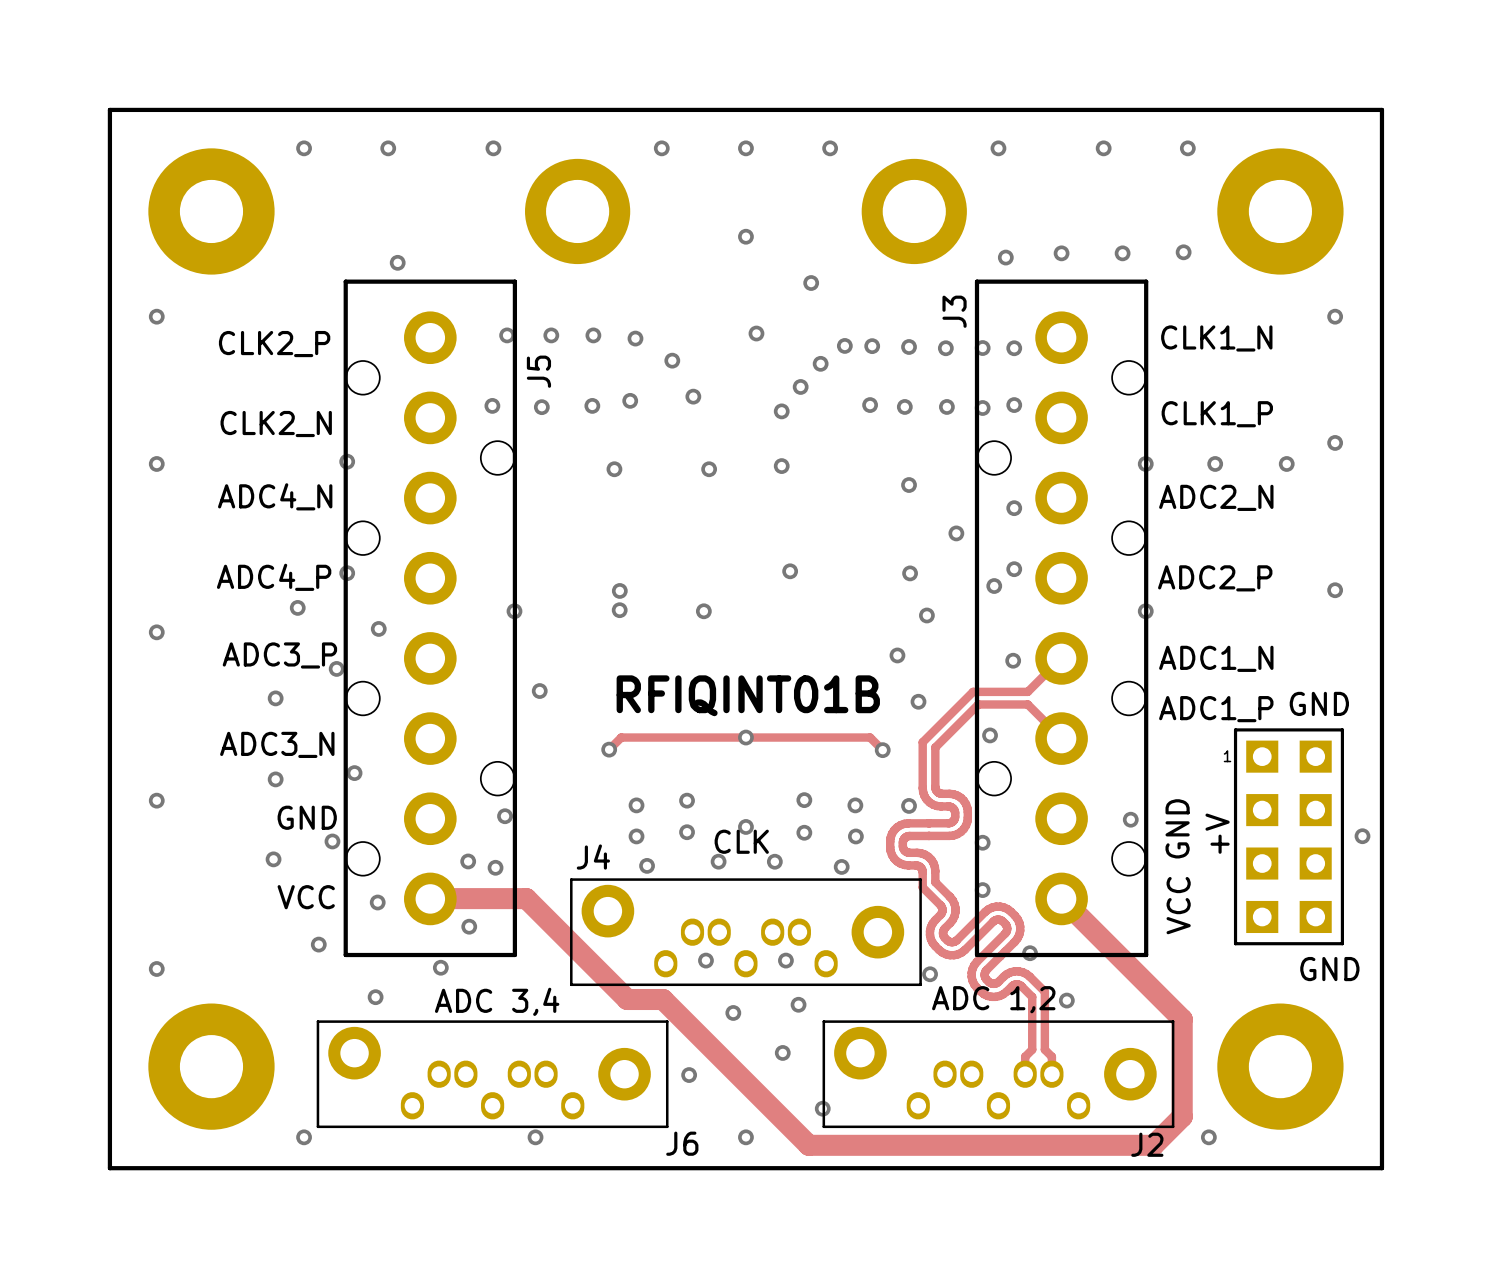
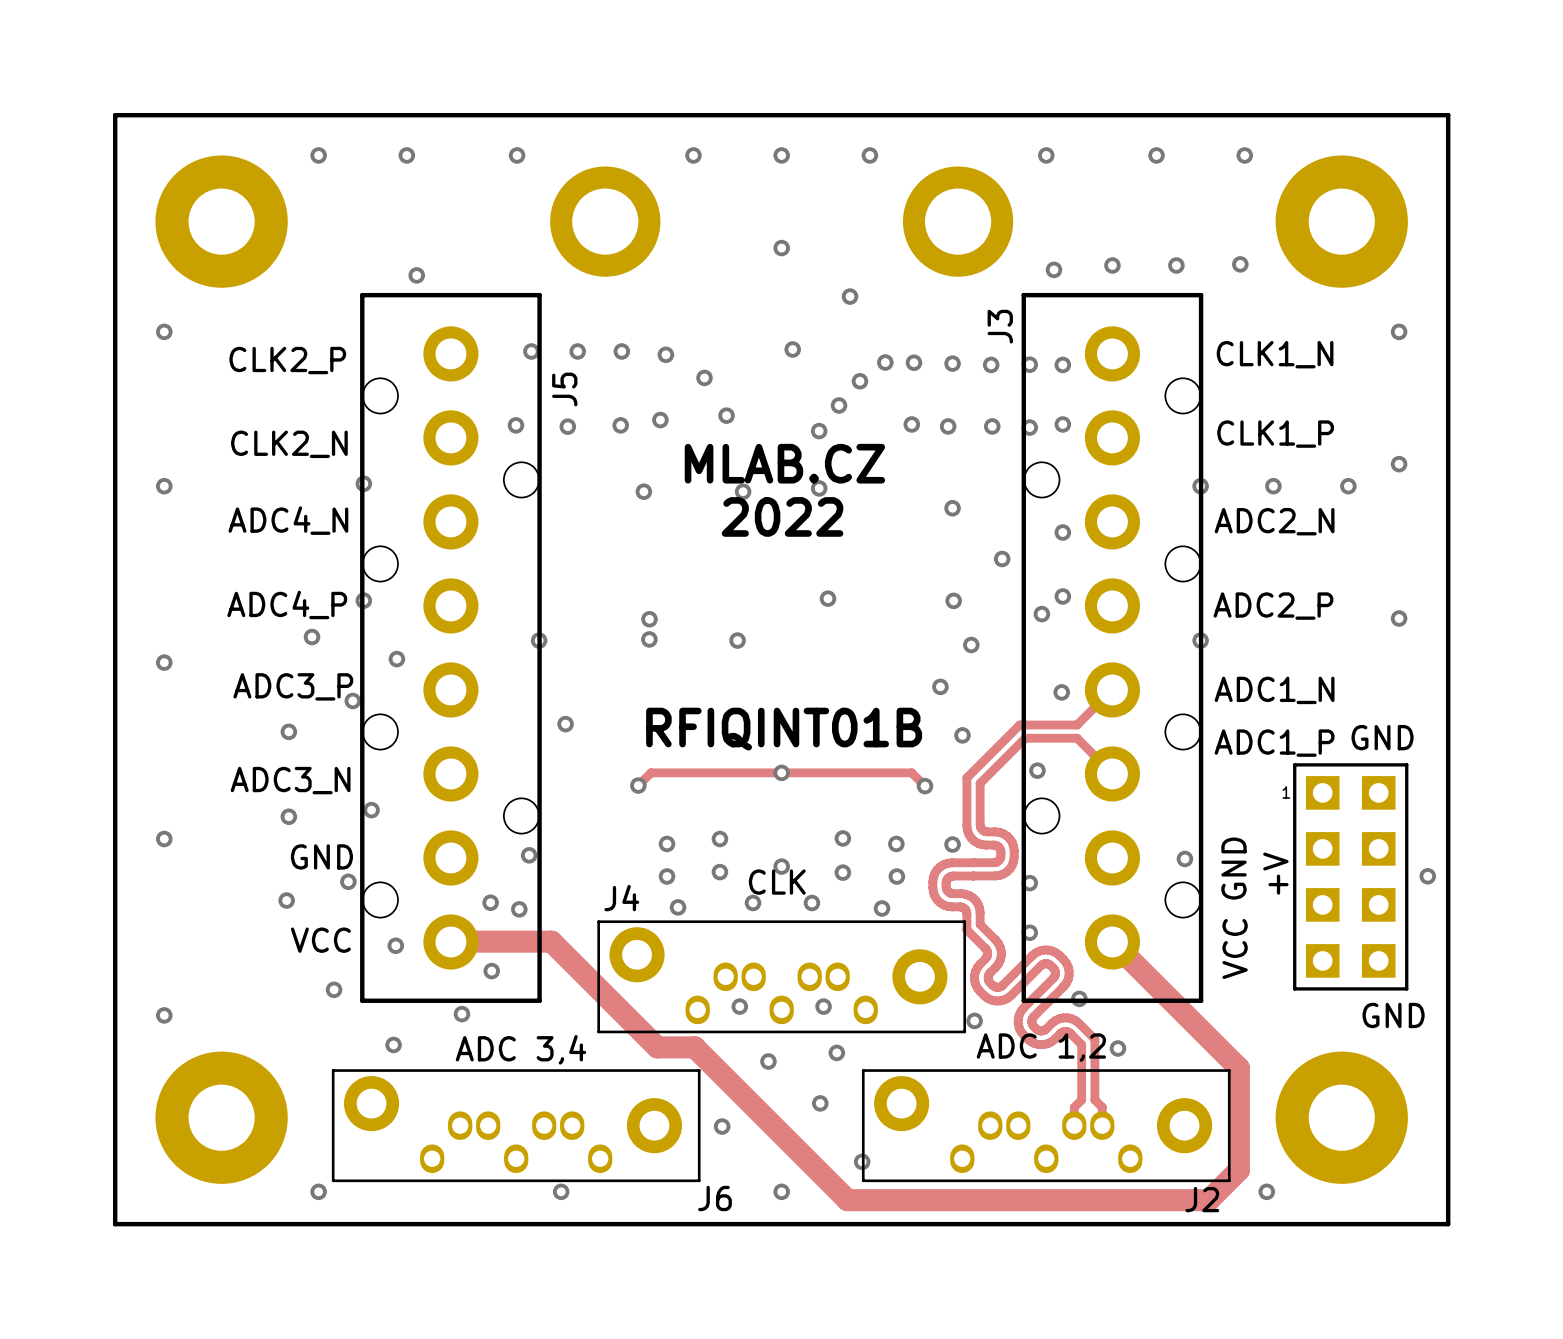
text: none -> MLAB.CZ (784, 463)
text: none -> 2022 (782, 516)

